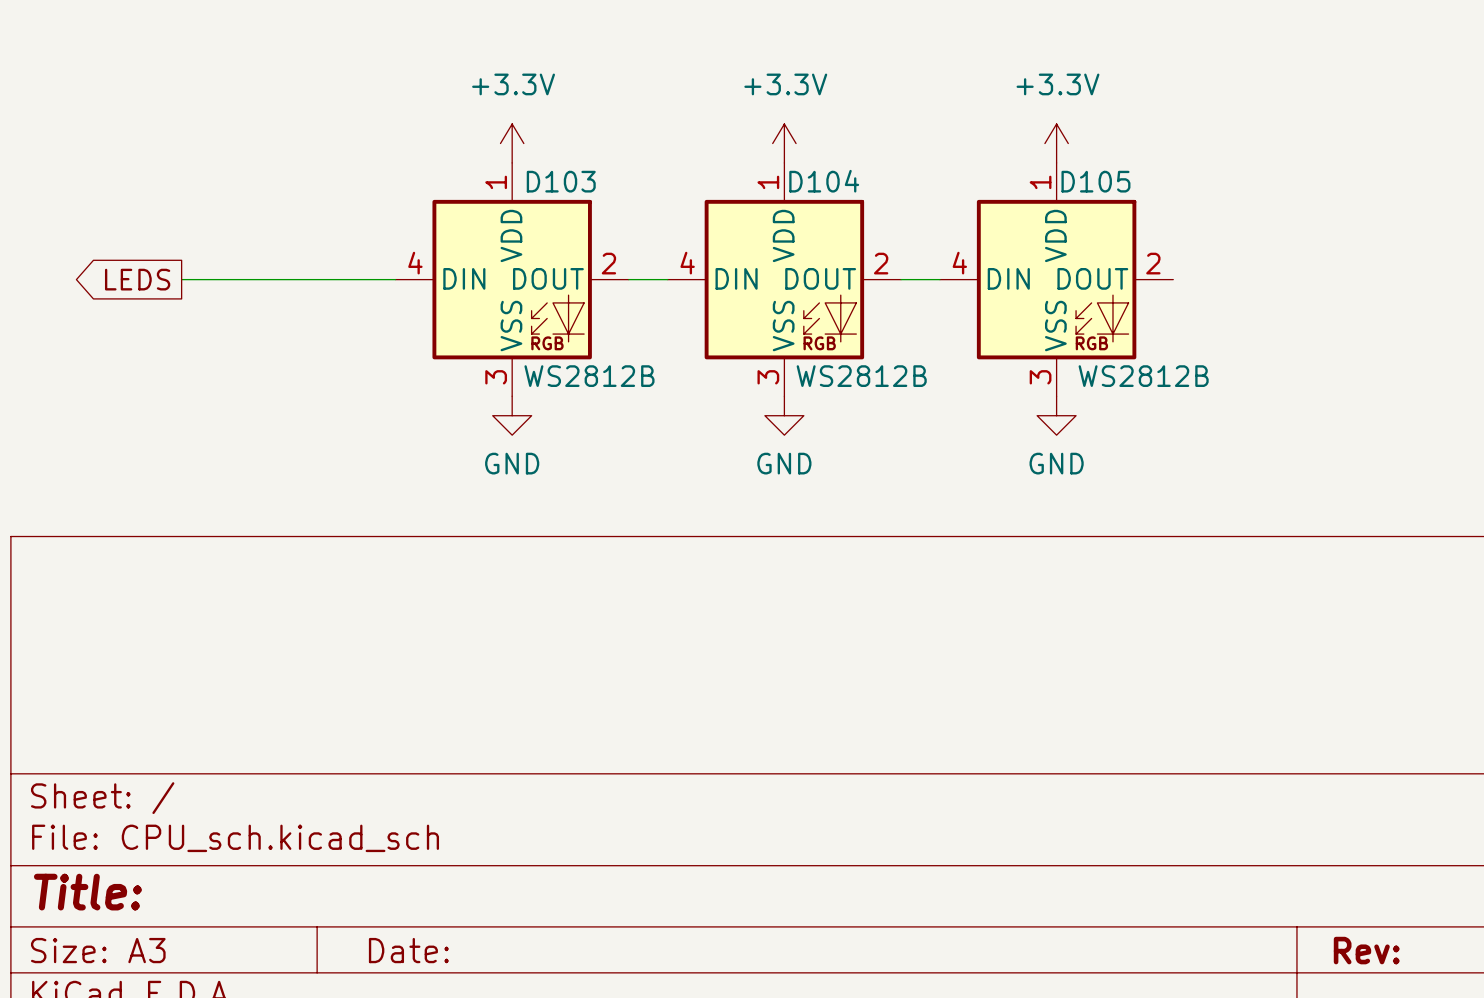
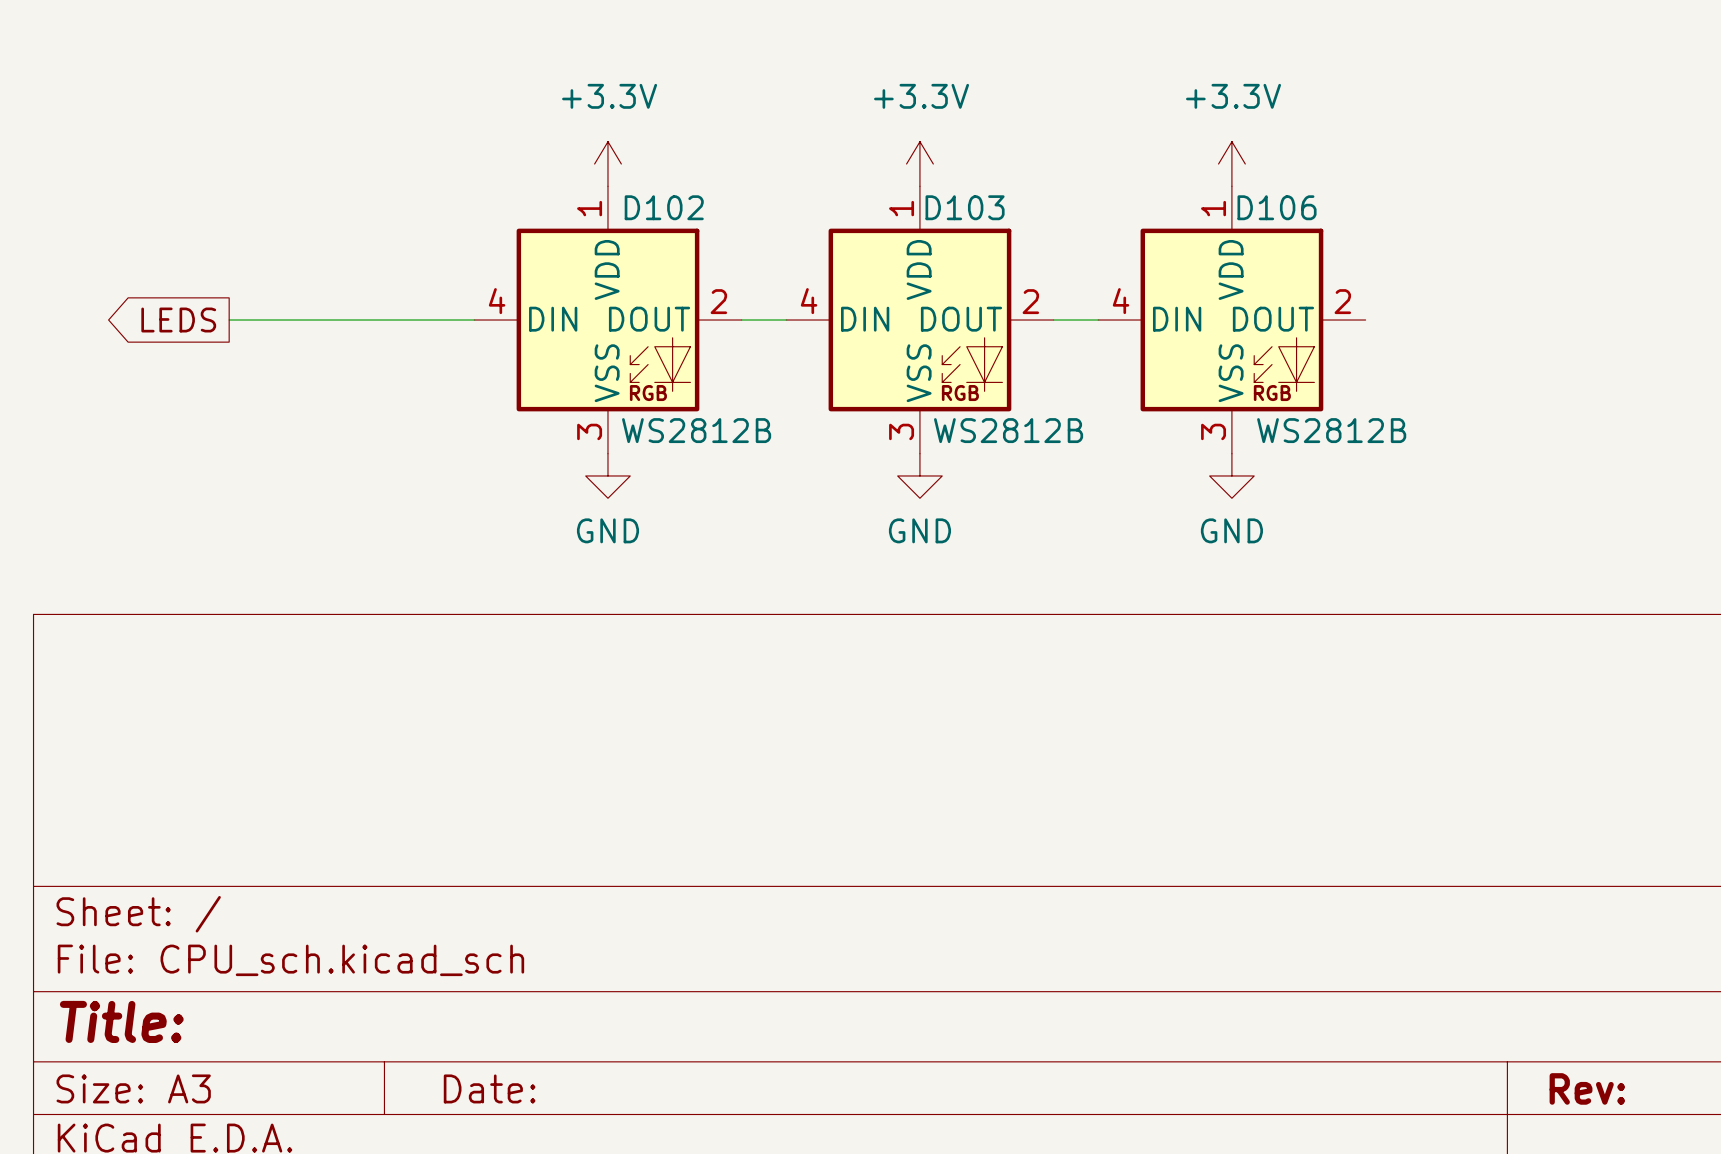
D103 name: D103 (561, 181) -> D102 (664, 207)
D104 name: D104 (824, 181) -> D103 (965, 207)
D105 name: D105 (1095, 181) -> D106 (1277, 207)

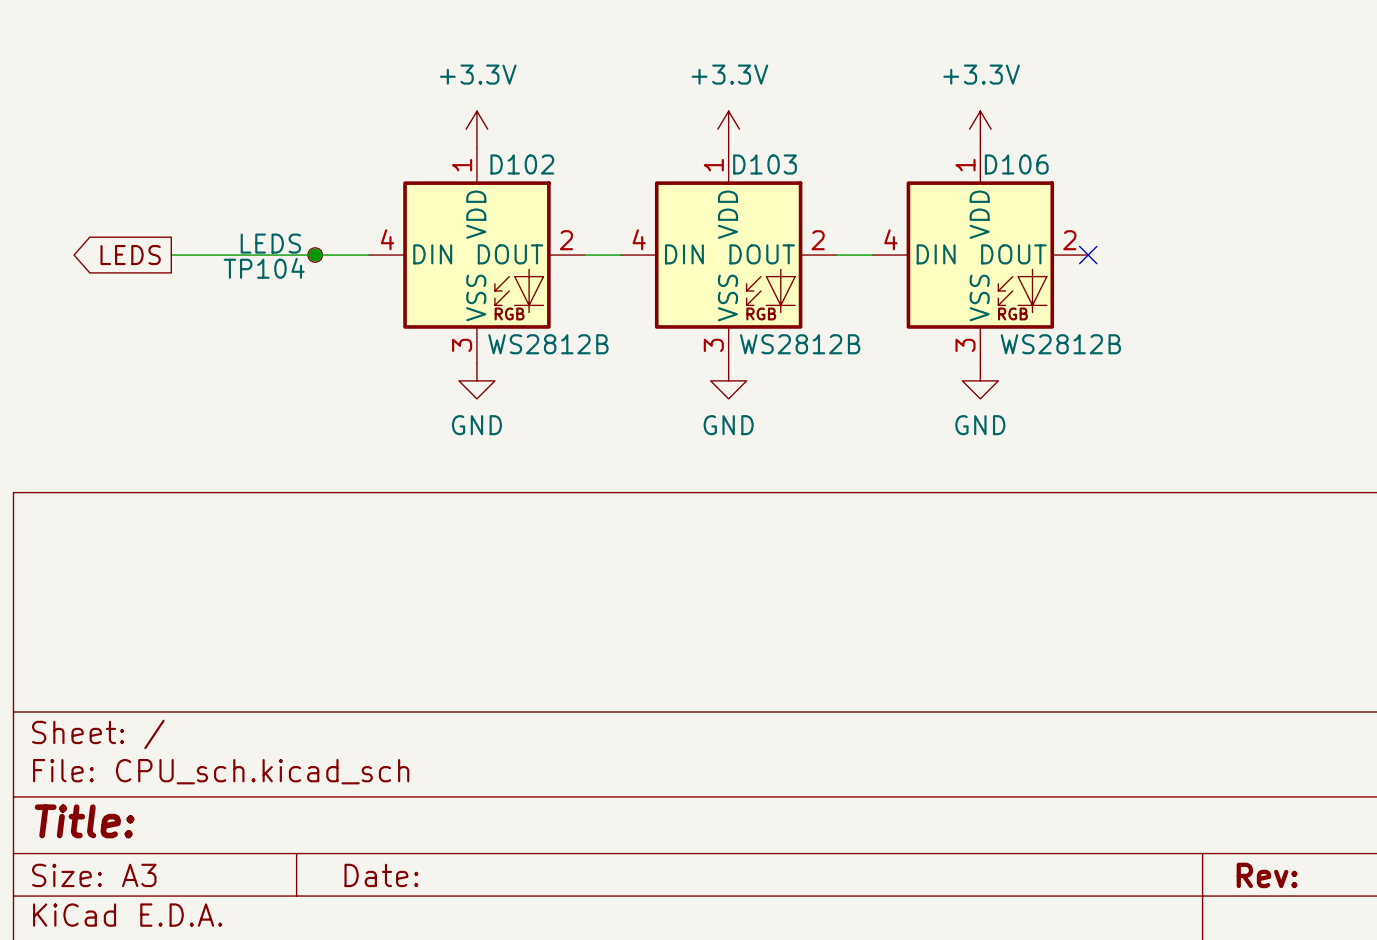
junction: none -> (315, 255)
TP104: none -> LEDS (315, 255)
no-connect mark: none -> (1088, 255)

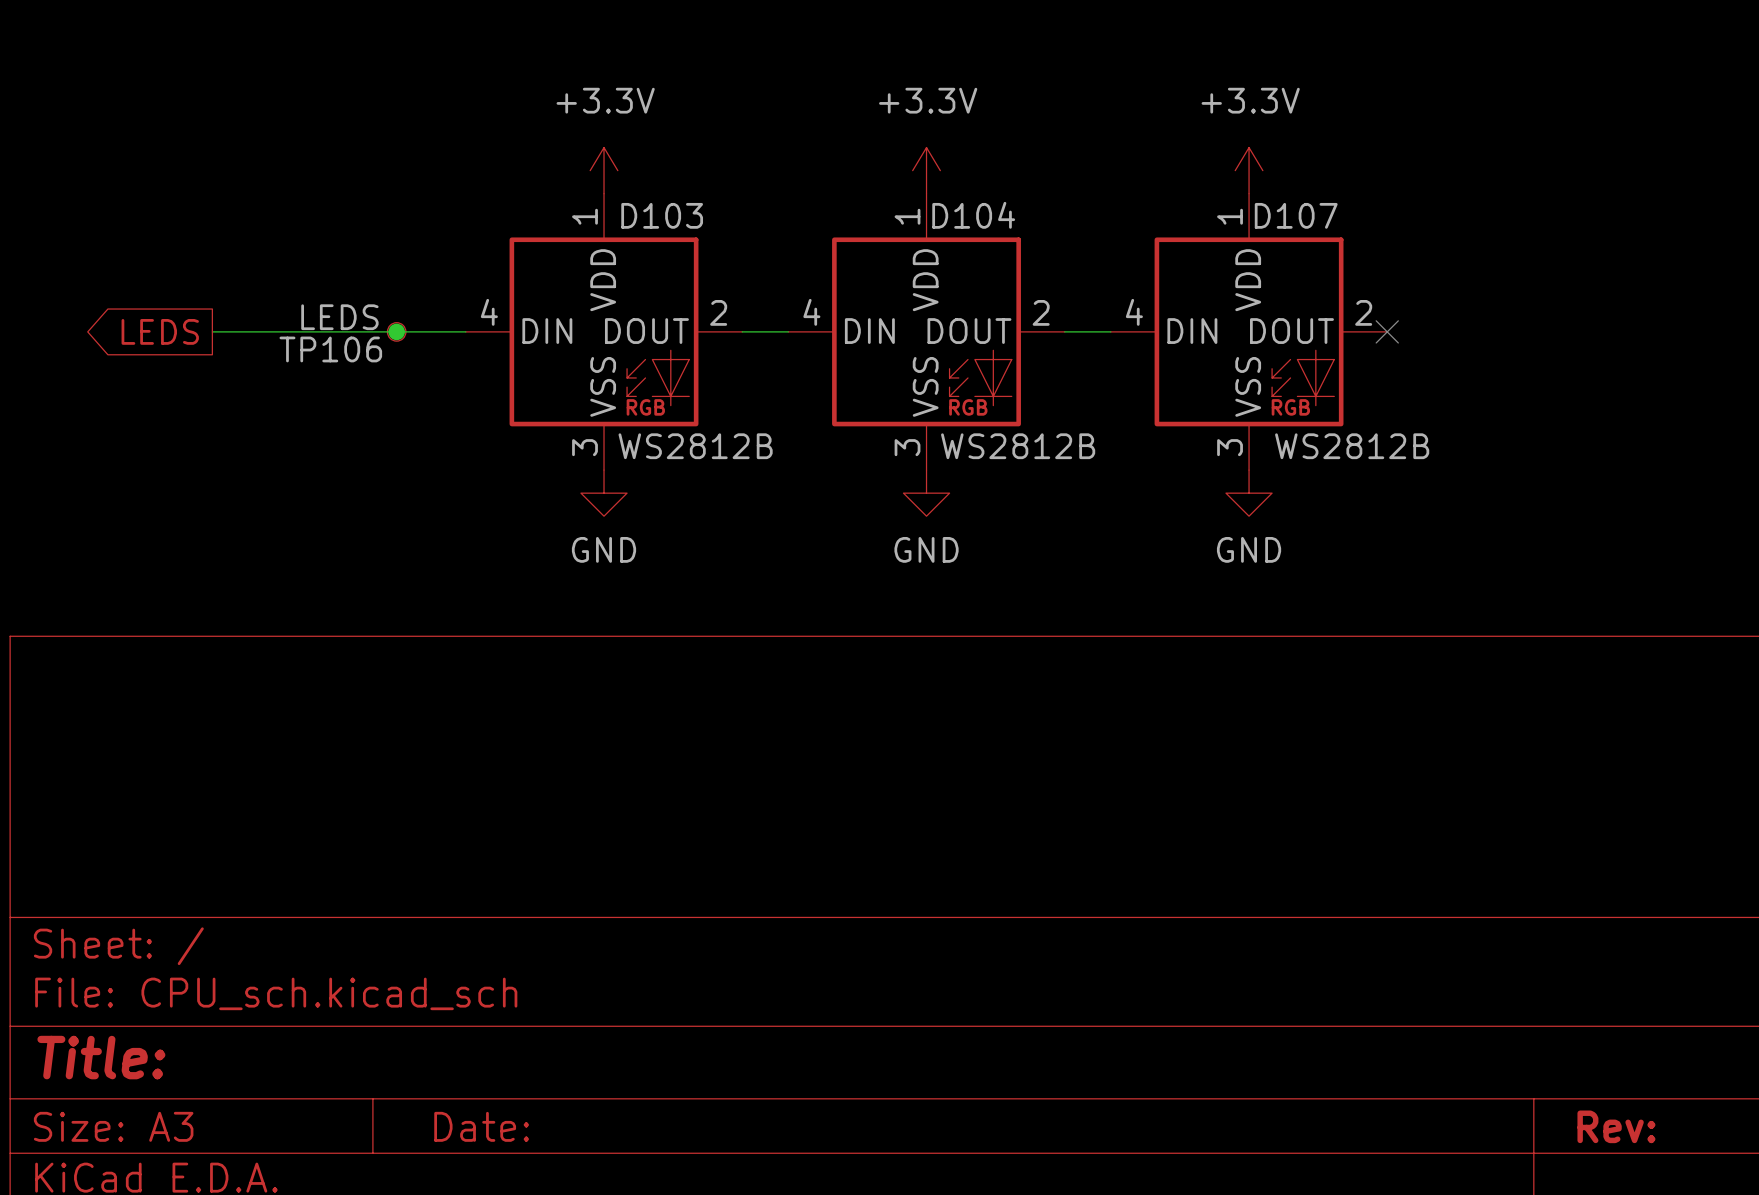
D102 name: D102 (522, 164) -> D103 (662, 215)
D103 name: D103 (765, 164) -> D104 (973, 215)
D106 name: D106 (1016, 164) -> D107 (1296, 215)
TP104 name: TP104 (264, 268) -> TP106 (330, 349)

